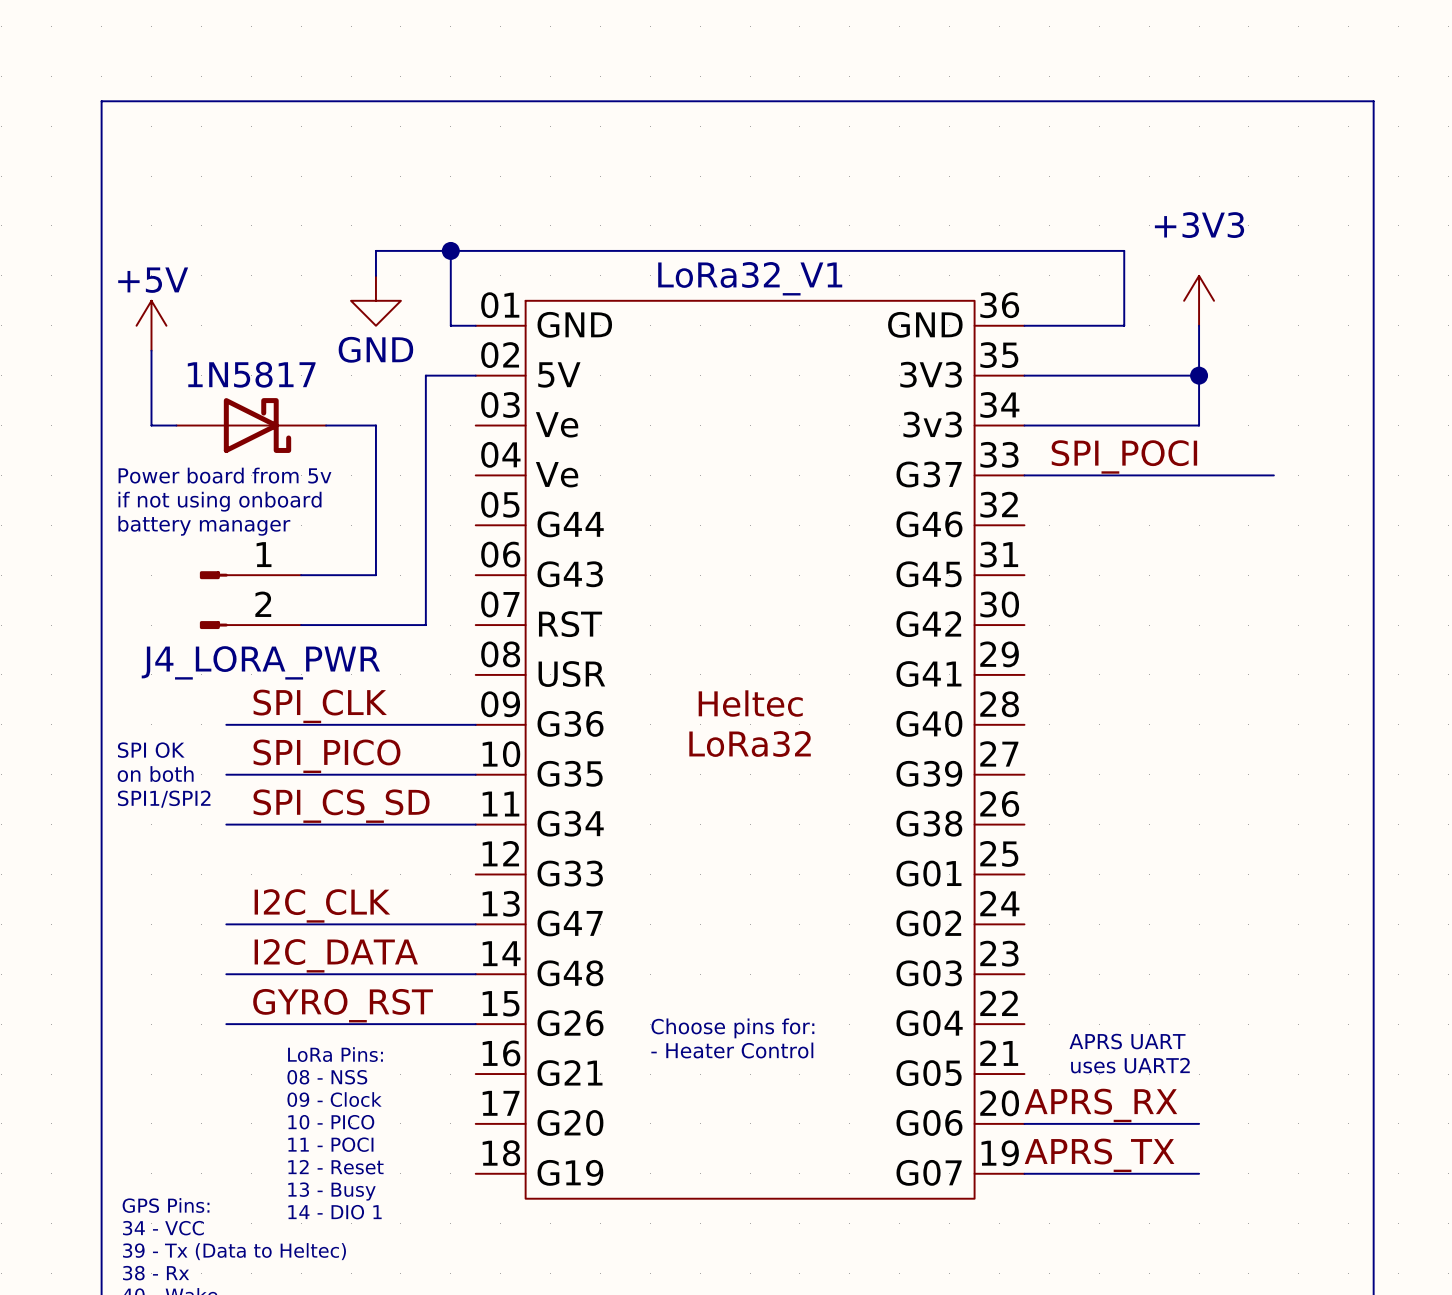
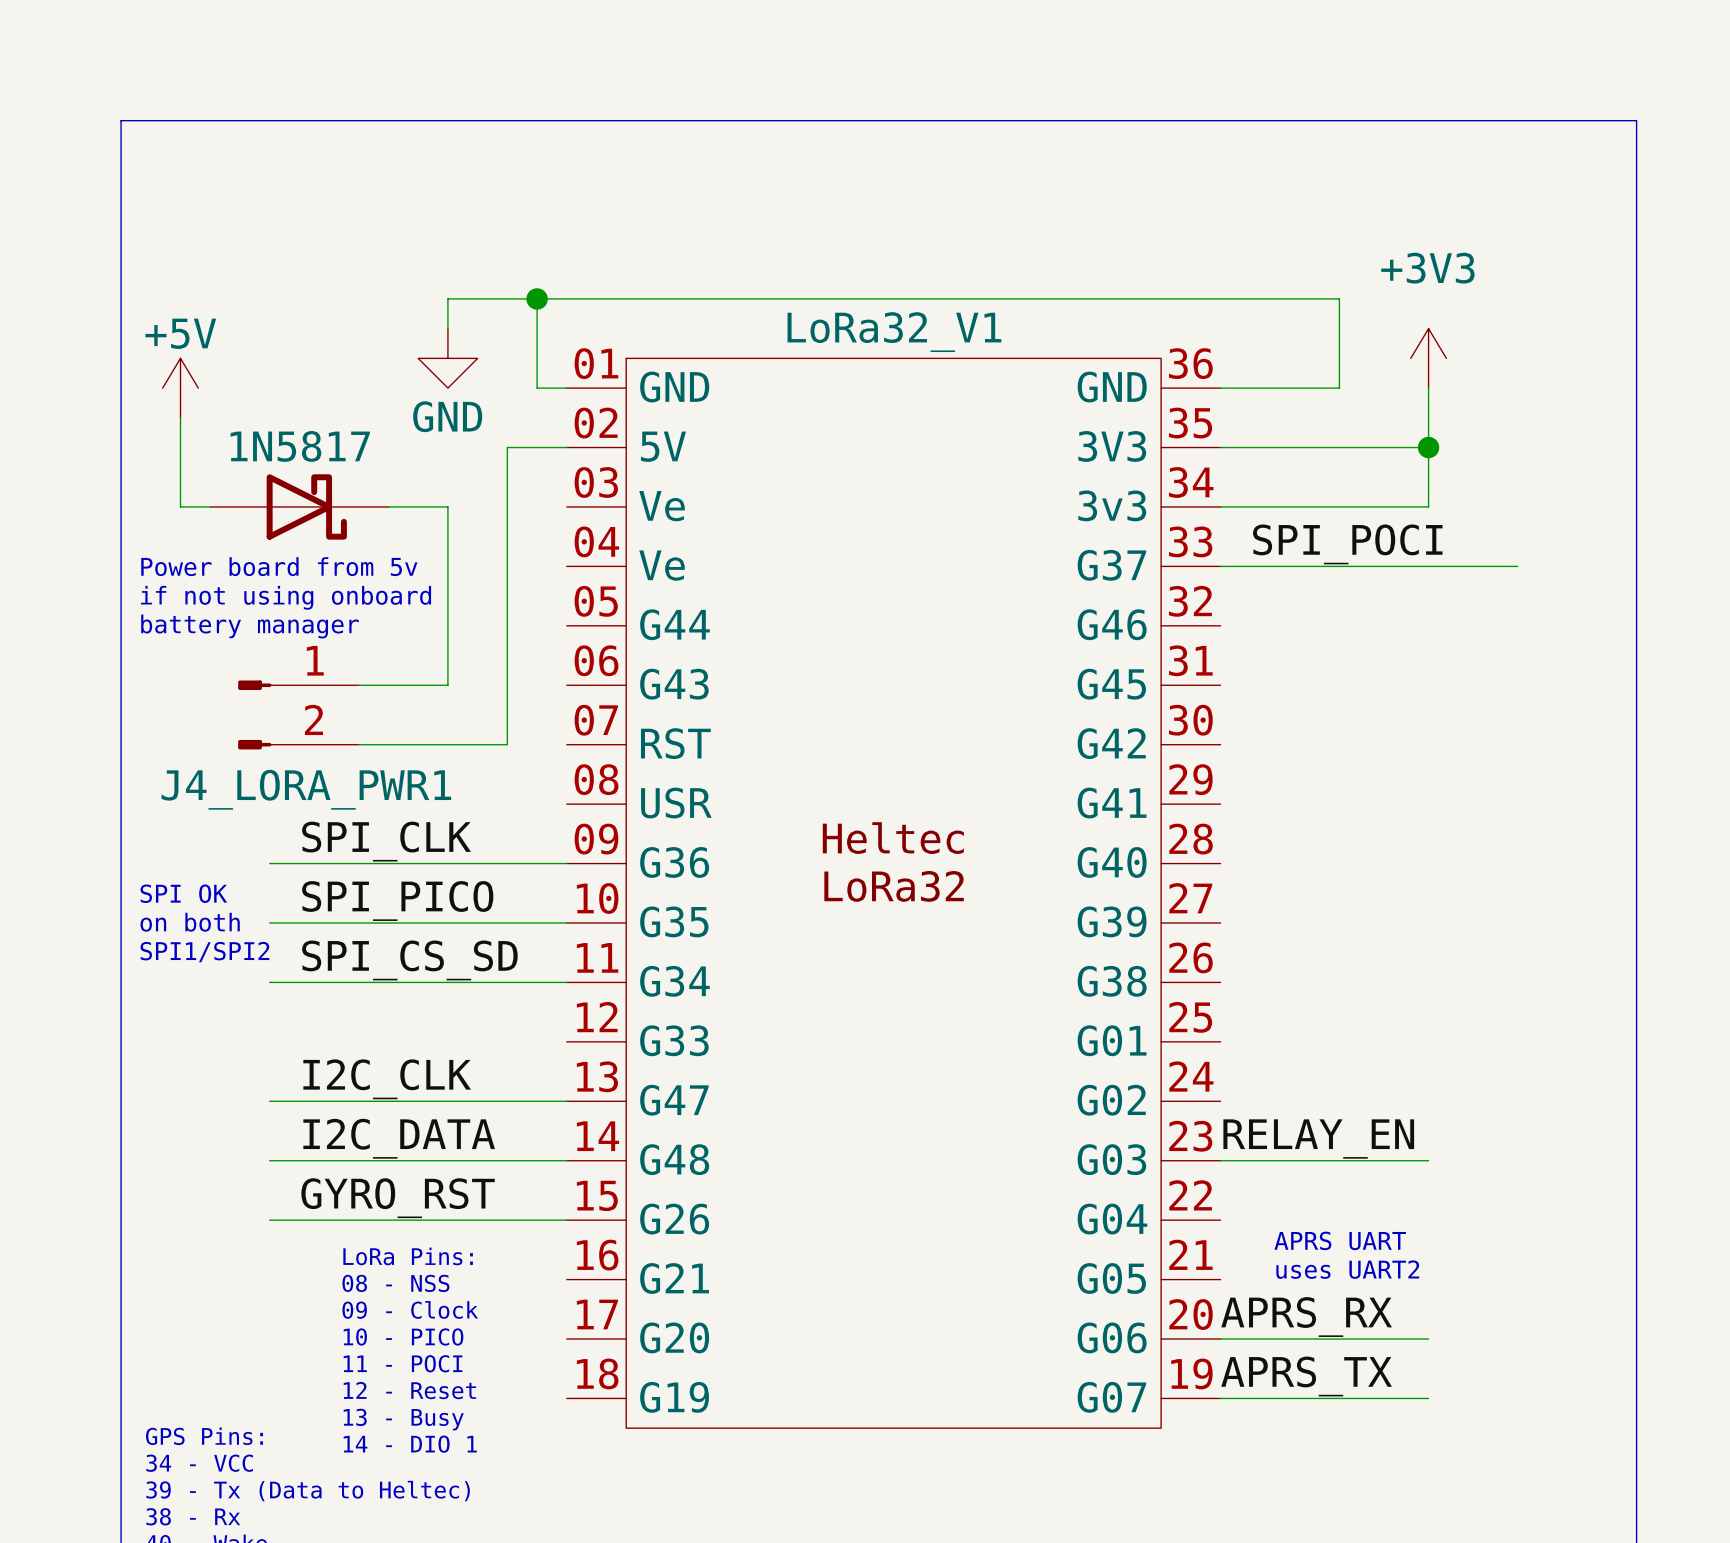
J4_LORA_PWR name: J4_LORA_PWR (260, 662) -> J4_LORA_PWR1 (306, 789)
label: none -> RELAY_EN (1318, 1139)
wire: none -> (1220, 1160) (1428, 1160)
text: Choose pins for: (732, 1028) -> none
text: - Heater Control (732, 1050) -> none

